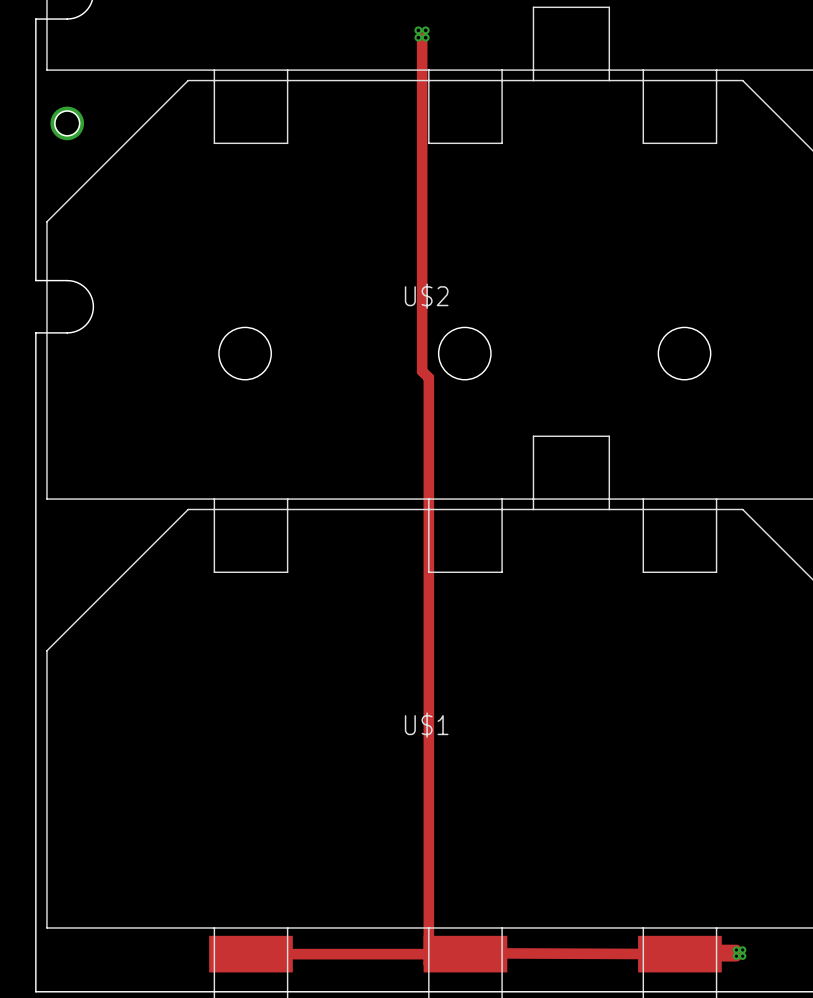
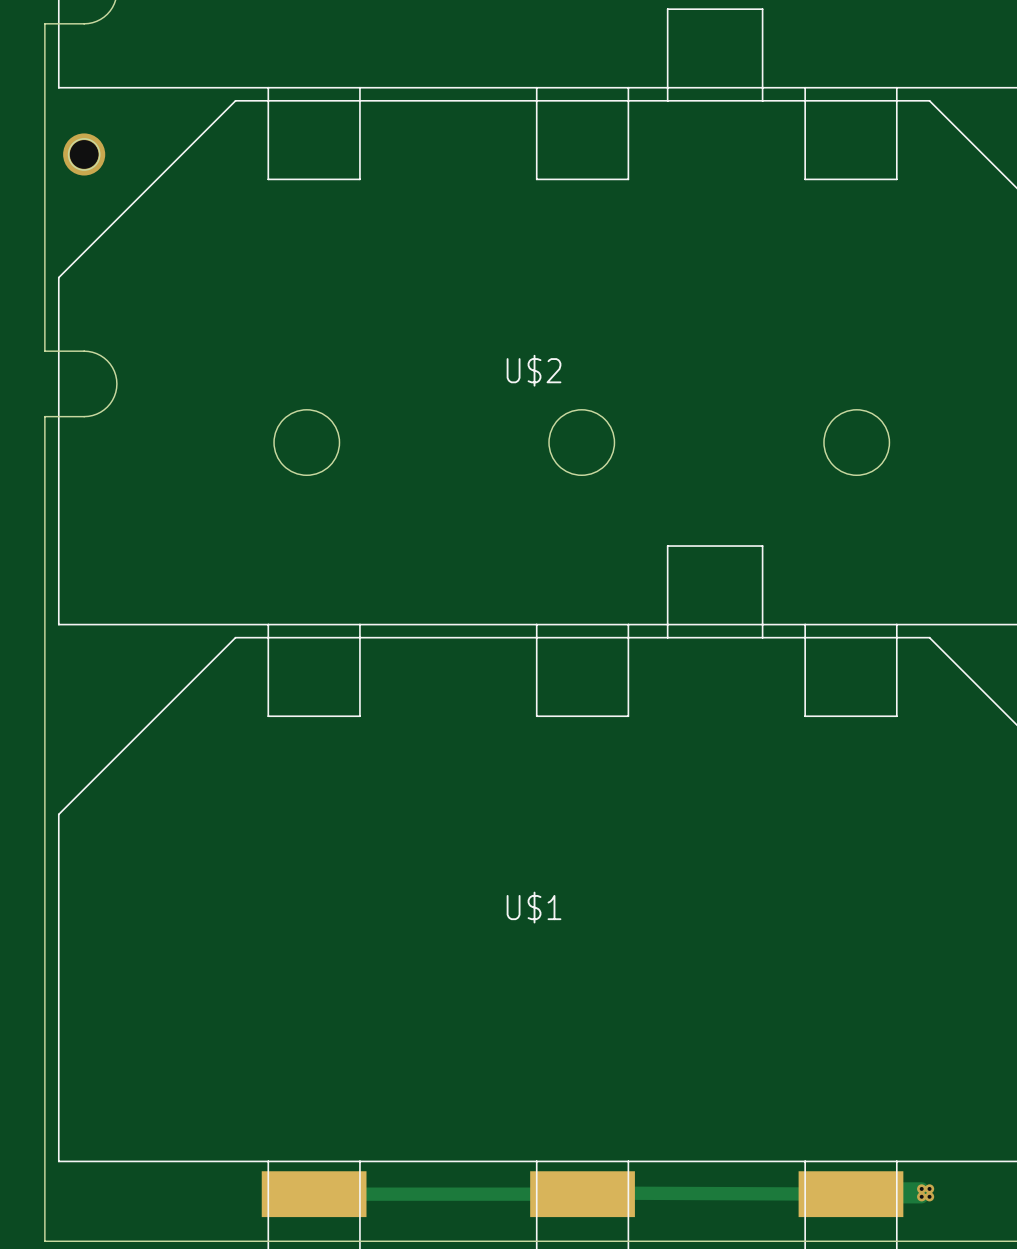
via: (418, 30) -> none
via: (425, 30) -> none
via: (418, 37) -> none
track: (421, 37) (422, 371) (428, 377) (428, 963) (438, 954) -> none
via: (425, 37) -> none

